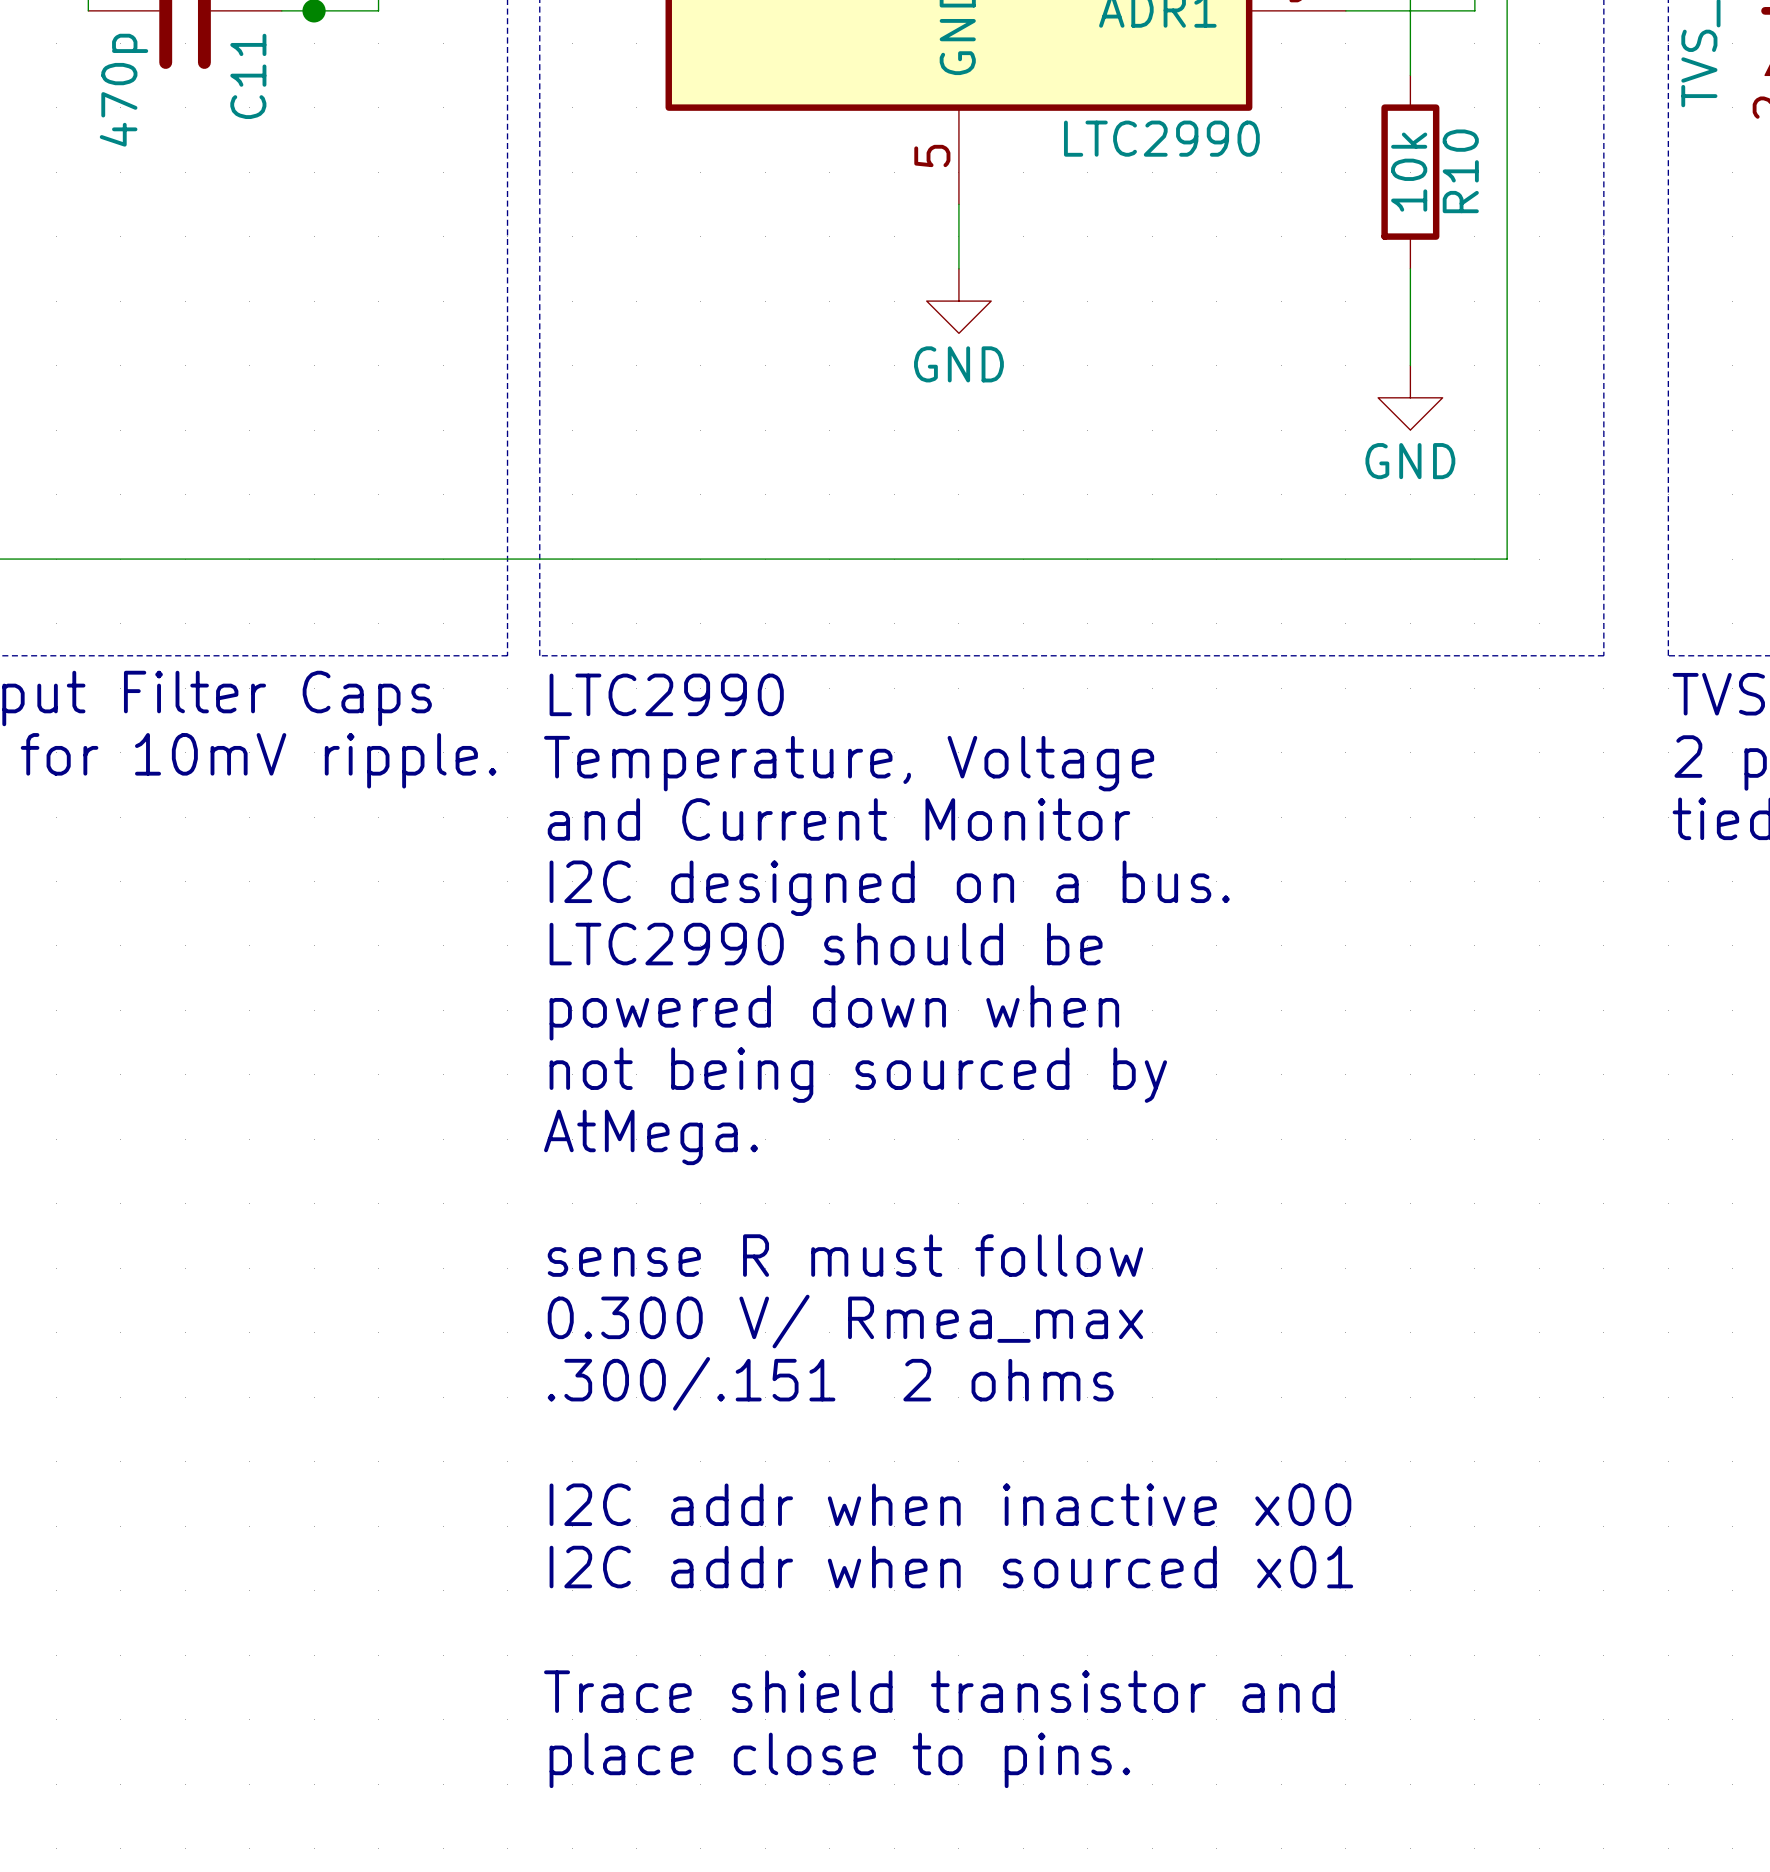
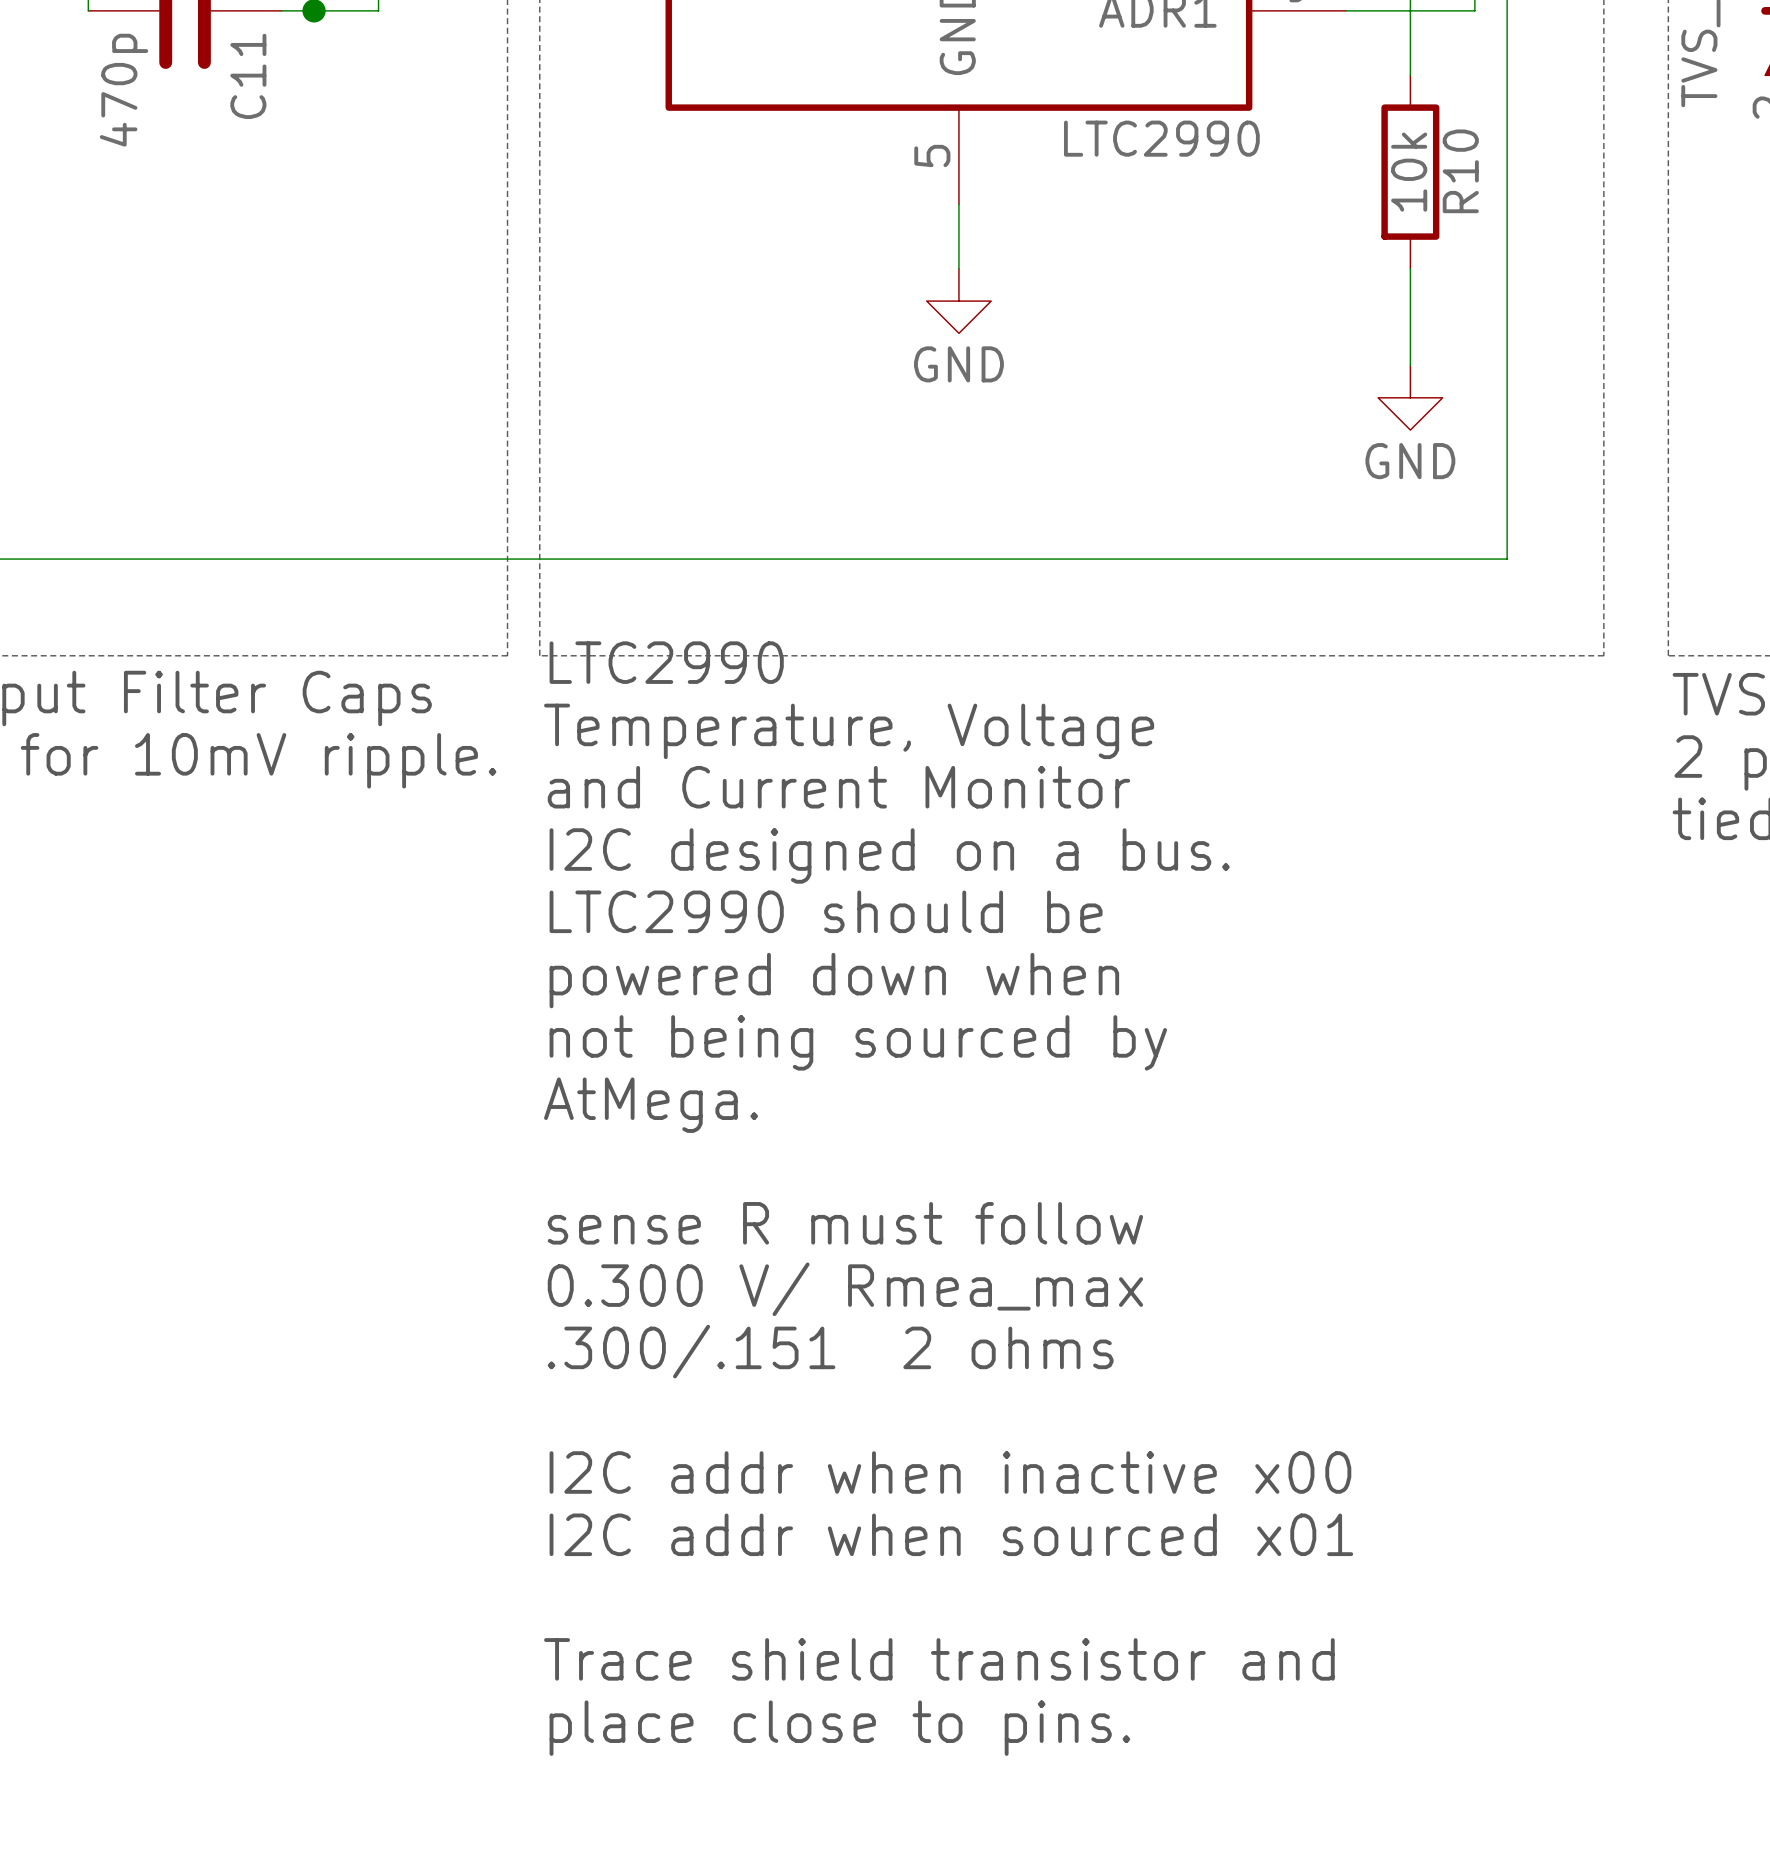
text position: LTC2990 (666, 694) -> LTC2990 (666, 662)
text position: Temperature, Voltage (849, 763) -> Temperature, Voltage (849, 731)
text position: and Current Monitor (838, 819) -> and Current Monitor (838, 787)
text position: I2C designed on a bus. (889, 888) -> I2C designed on a bus. (889, 855)
text position: LTC2990 should be (826, 944) -> LTC2990 should be (826, 911)
text position: powered down when (834, 1012) -> powered down when (834, 980)
text position: not being sourced by (858, 1075) -> not being sourced by (858, 1042)
text position: AtMega. (651, 1137) -> AtMega. (651, 1105)
text position: sense R must follow (845, 1255) -> sense R must follow (845, 1223)
text position: 0.300 V/ Rmea_max (845, 1321) -> 0.300 V/ Rmea_max (845, 1289)
text position: .300/.151 2 ohms (830, 1383) -> .300/.151 2 ohms (830, 1351)
text position: I2C addr when inactive x00 (950, 1504) -> I2C addr when inactive x00 (950, 1472)
text position: I2C addr when sourced x01 (951, 1567) -> I2C addr when sourced x01 (951, 1534)
text position: Trace shield transistor and (939, 1691) -> Trace shield transistor and (939, 1659)
text position: place close to pins. (839, 1760) -> place close to pins. (839, 1728)

